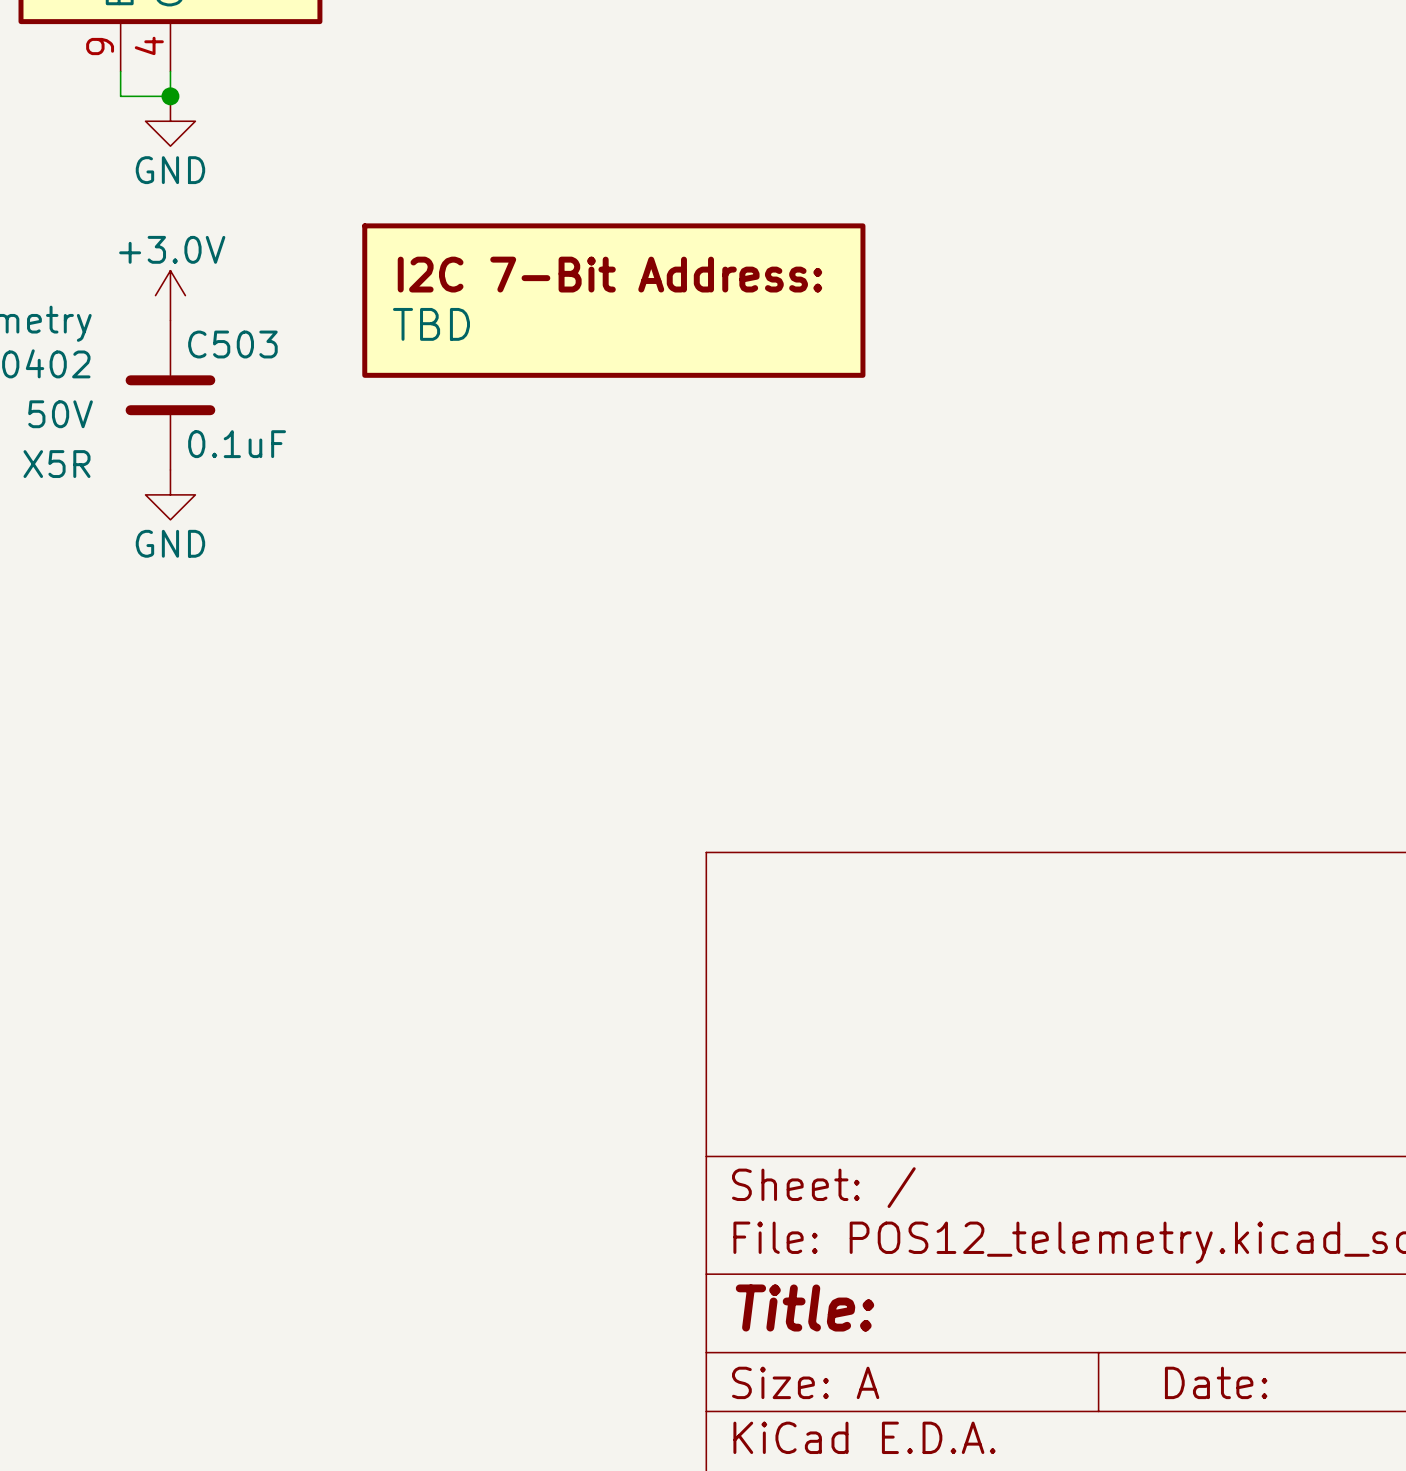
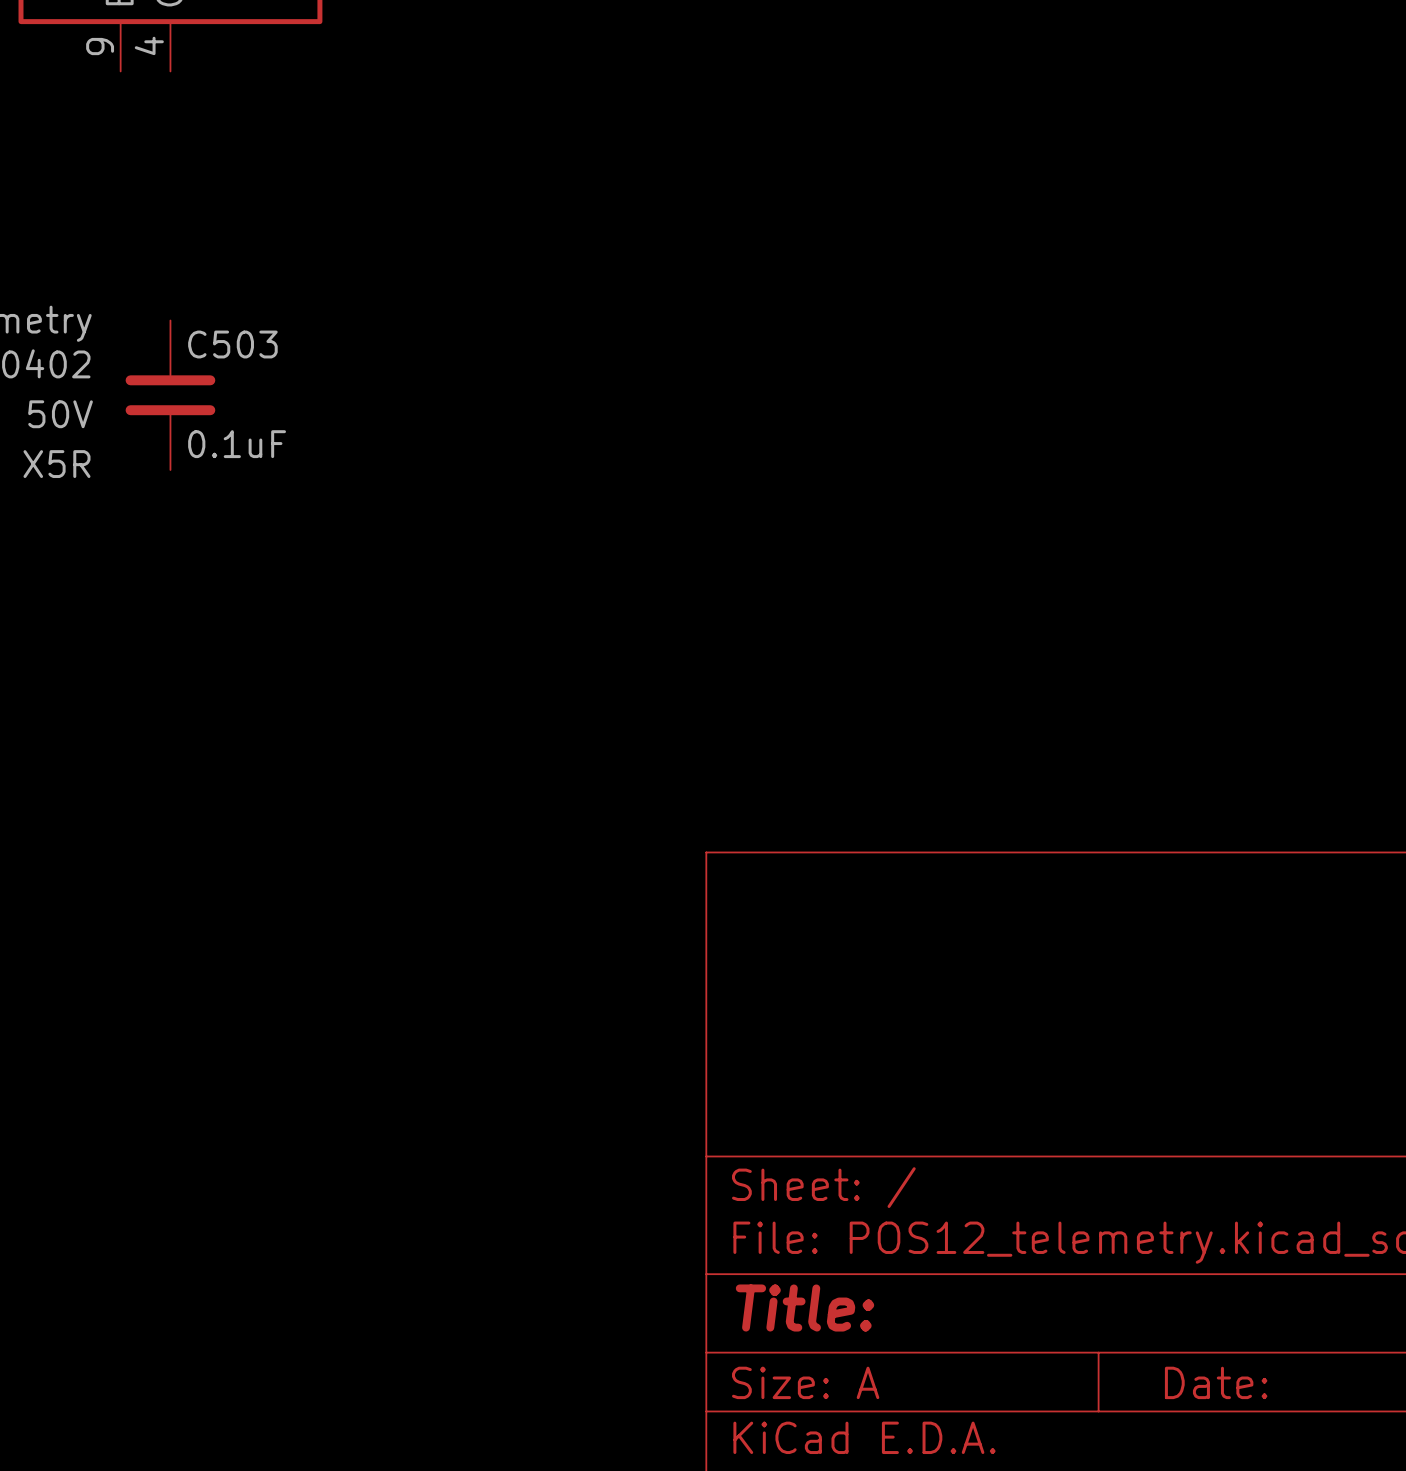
wire: (120, 71) (120, 96) (170, 96) (170, 71) -> none
junction: (170, 96) -> none
power symbol: GND (170, 121) -> none
power symbol: +3.0V (170, 295) -> none
part: TBD (613, 300) -> none
power symbol: GND (170, 494) -> none

